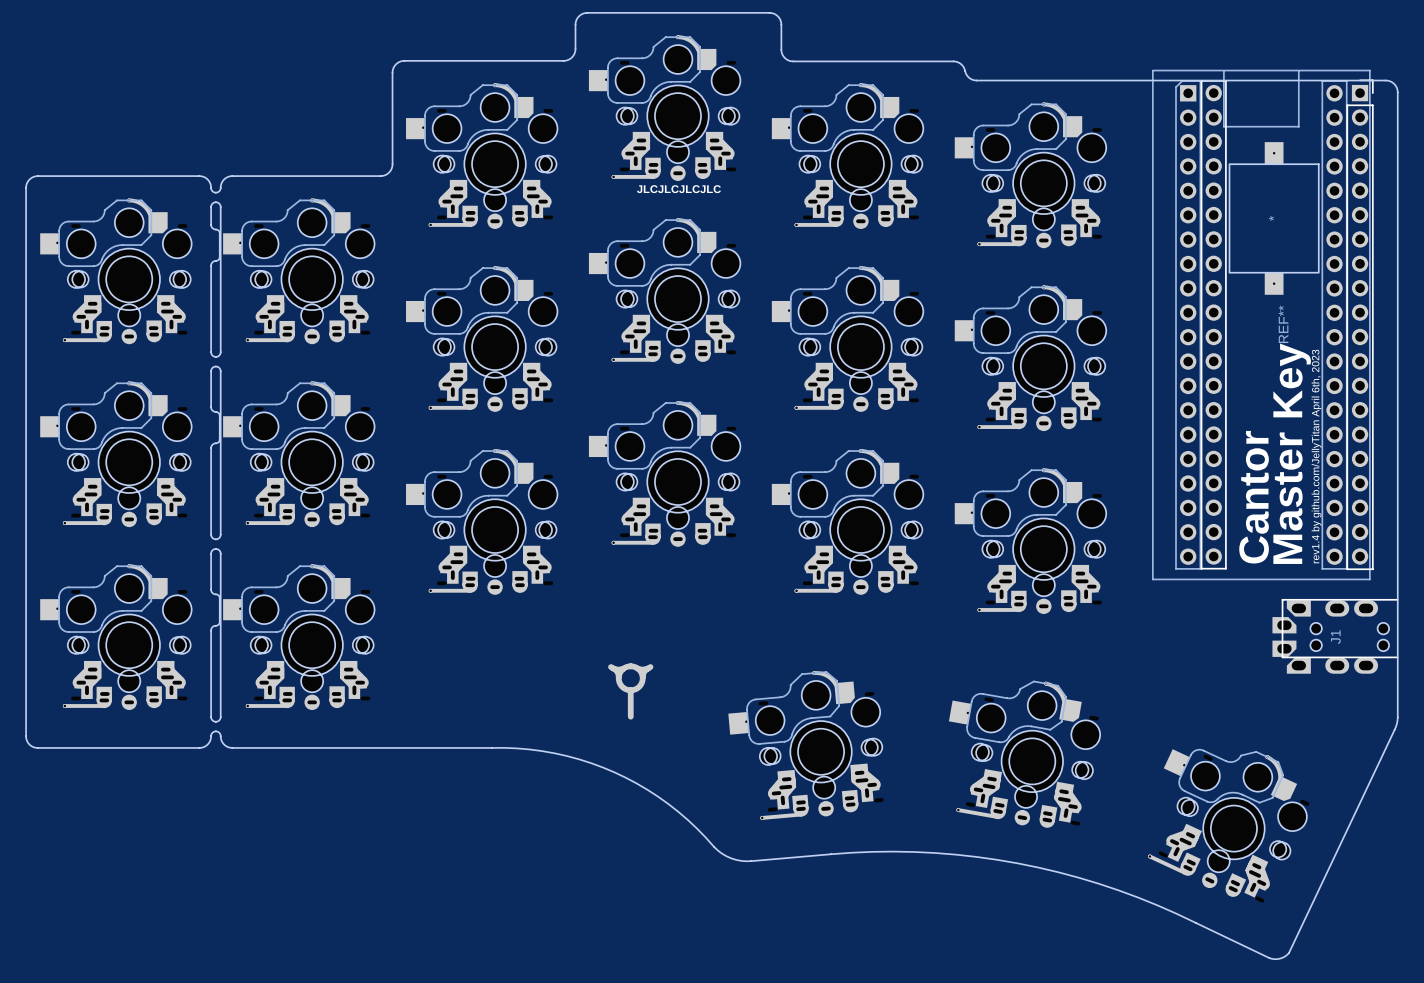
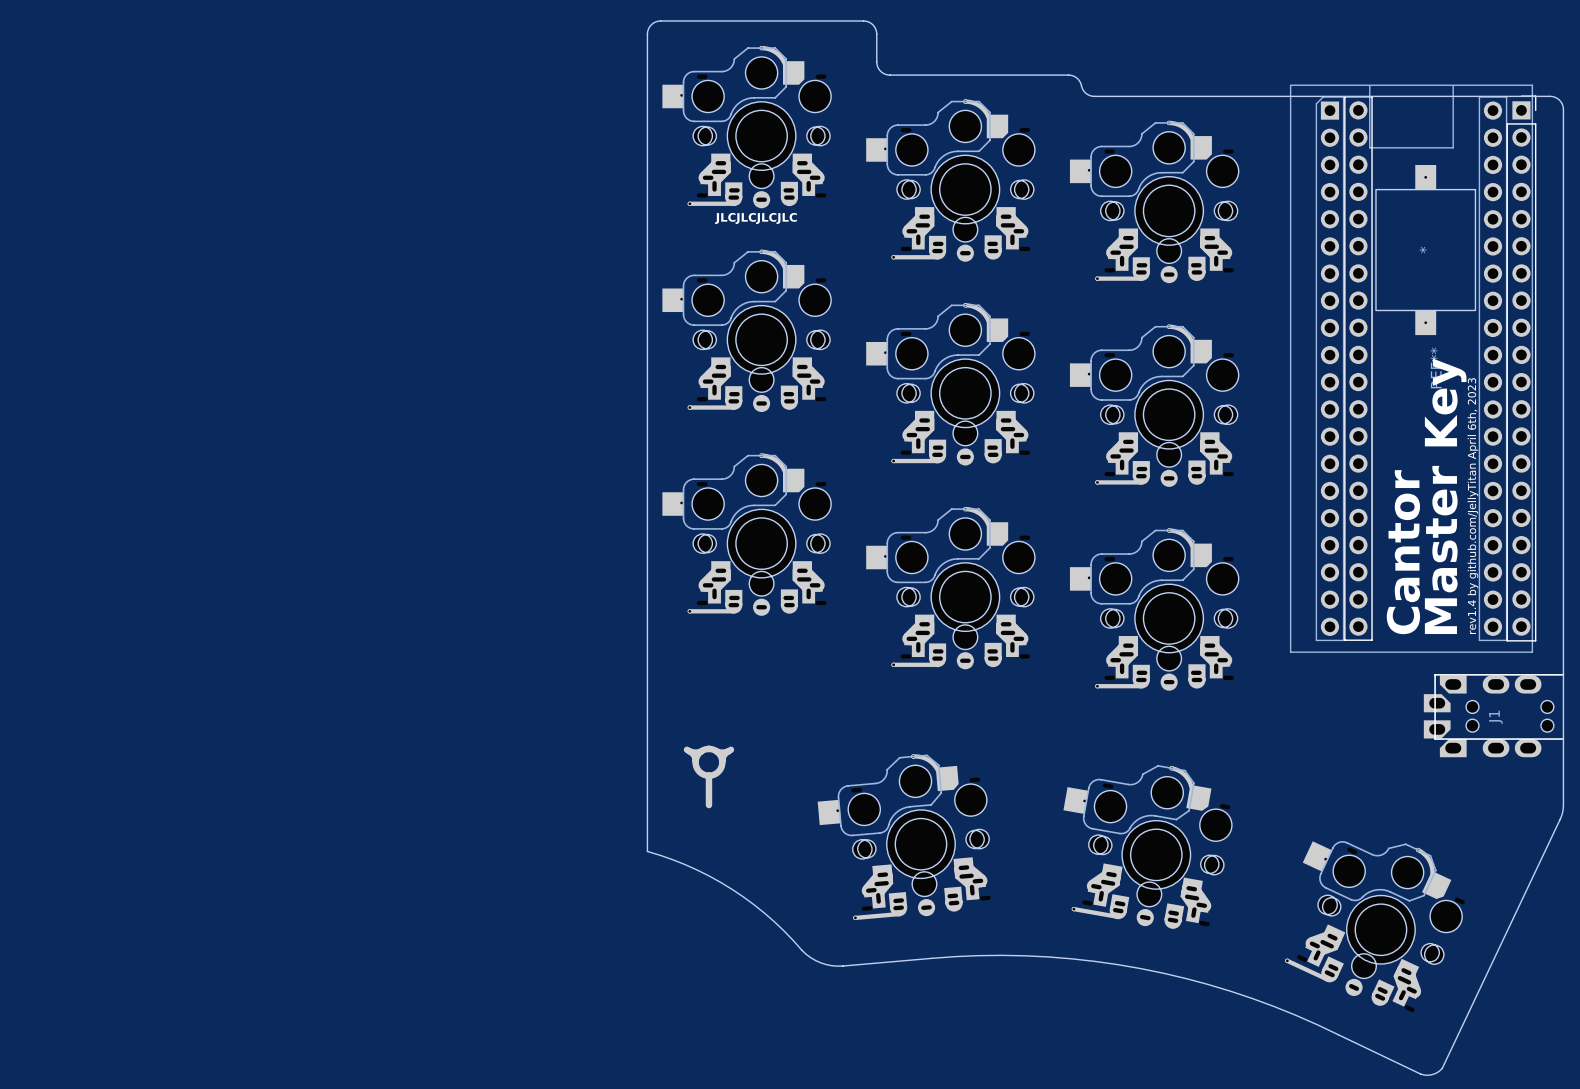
board edge: (575, 49) (572, 56) (564, 60) (404, 60) (398, 62) (392, 72) (392, 165) (390, 171) (383, 175) (231, 176) (224, 179) (219, 190) (215, 192) (211, 190) (207, 179) (200, 176) (37, 176) (28, 180) (26, 187) (26, 738) (29, 744) (36, 747) (199, 747) (207, 744) (211, 733) (215, 731) (219, 733) (224, 744) (231, 747) (504, 747) (541, 751) (590, 763) (636, 783) (678, 811) (714, 847) -> (647, 61) (647, 851) (697, 870) (732, 889) (764, 913) (802, 950)
part: (481, 156) -> none
board edge: (215, 202) (220, 207) (220, 352) (215, 356) (211, 352) (211, 265) (219, 257) (219, 232) (211, 225) (211, 205) (215, 202) -> none
part: (115, 271) -> none
part: (298, 271) -> none
part: (481, 339) -> none
board edge: (215, 366) (220, 371) (220, 534) (215, 539) (211, 534) (211, 447) (219, 439) (219, 414) (212, 410) (211, 407) (211, 370) (215, 366) -> none
part: (115, 454) -> none
part: (298, 454) -> none
part: (481, 521) -> none
board edge: (215, 548) (220, 553) (220, 716) (215, 721) (211, 716) (211, 630) (219, 621) (219, 597) (212, 592) (211, 589) (211, 553) (215, 548) -> none
part: (115, 637) -> none
part: (298, 637) -> none

